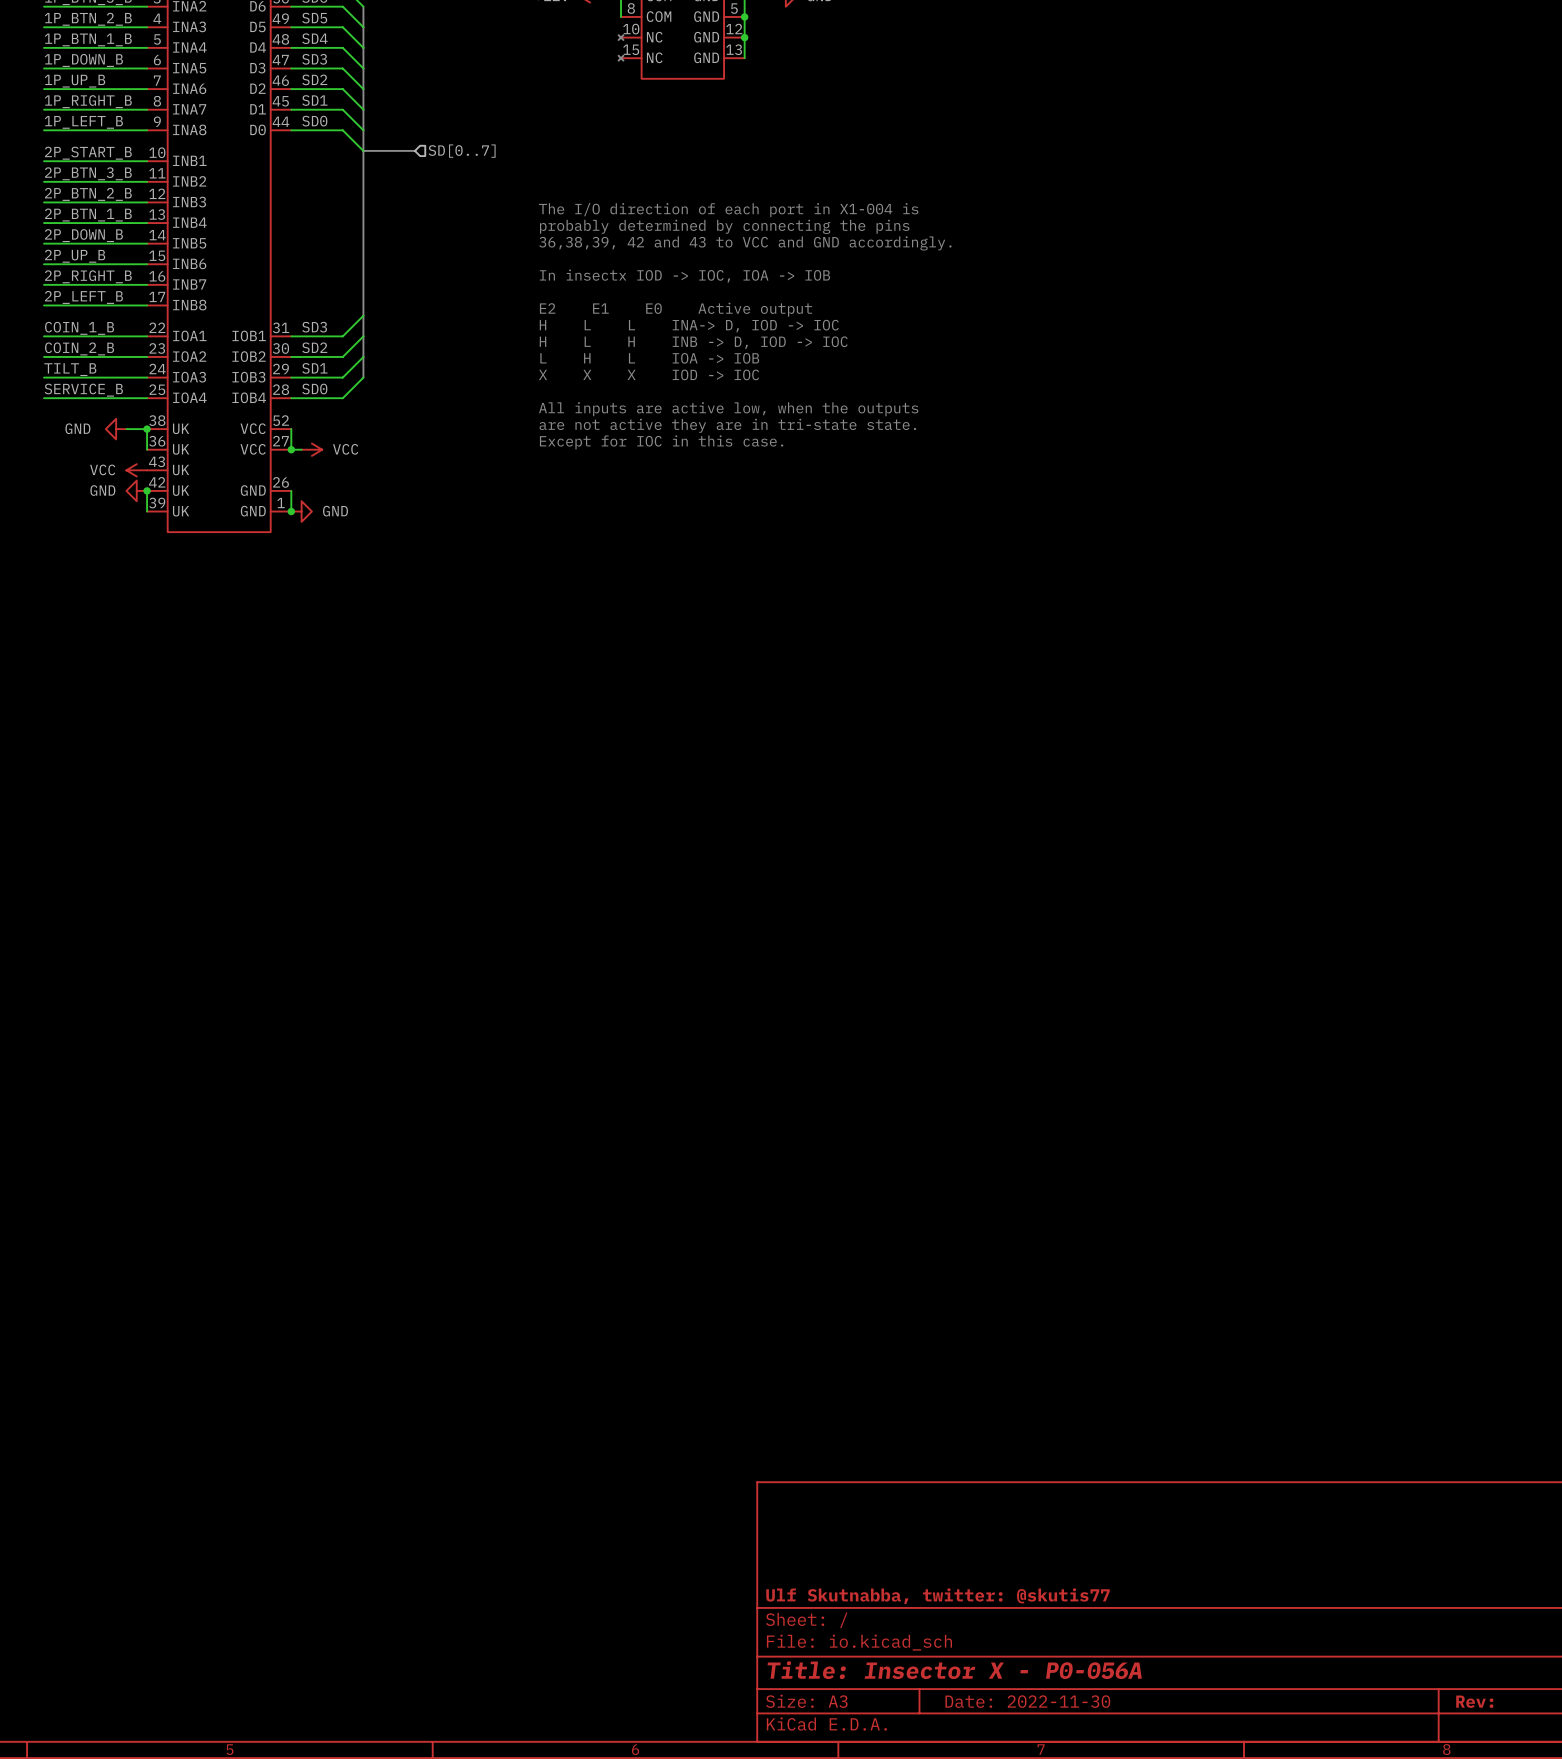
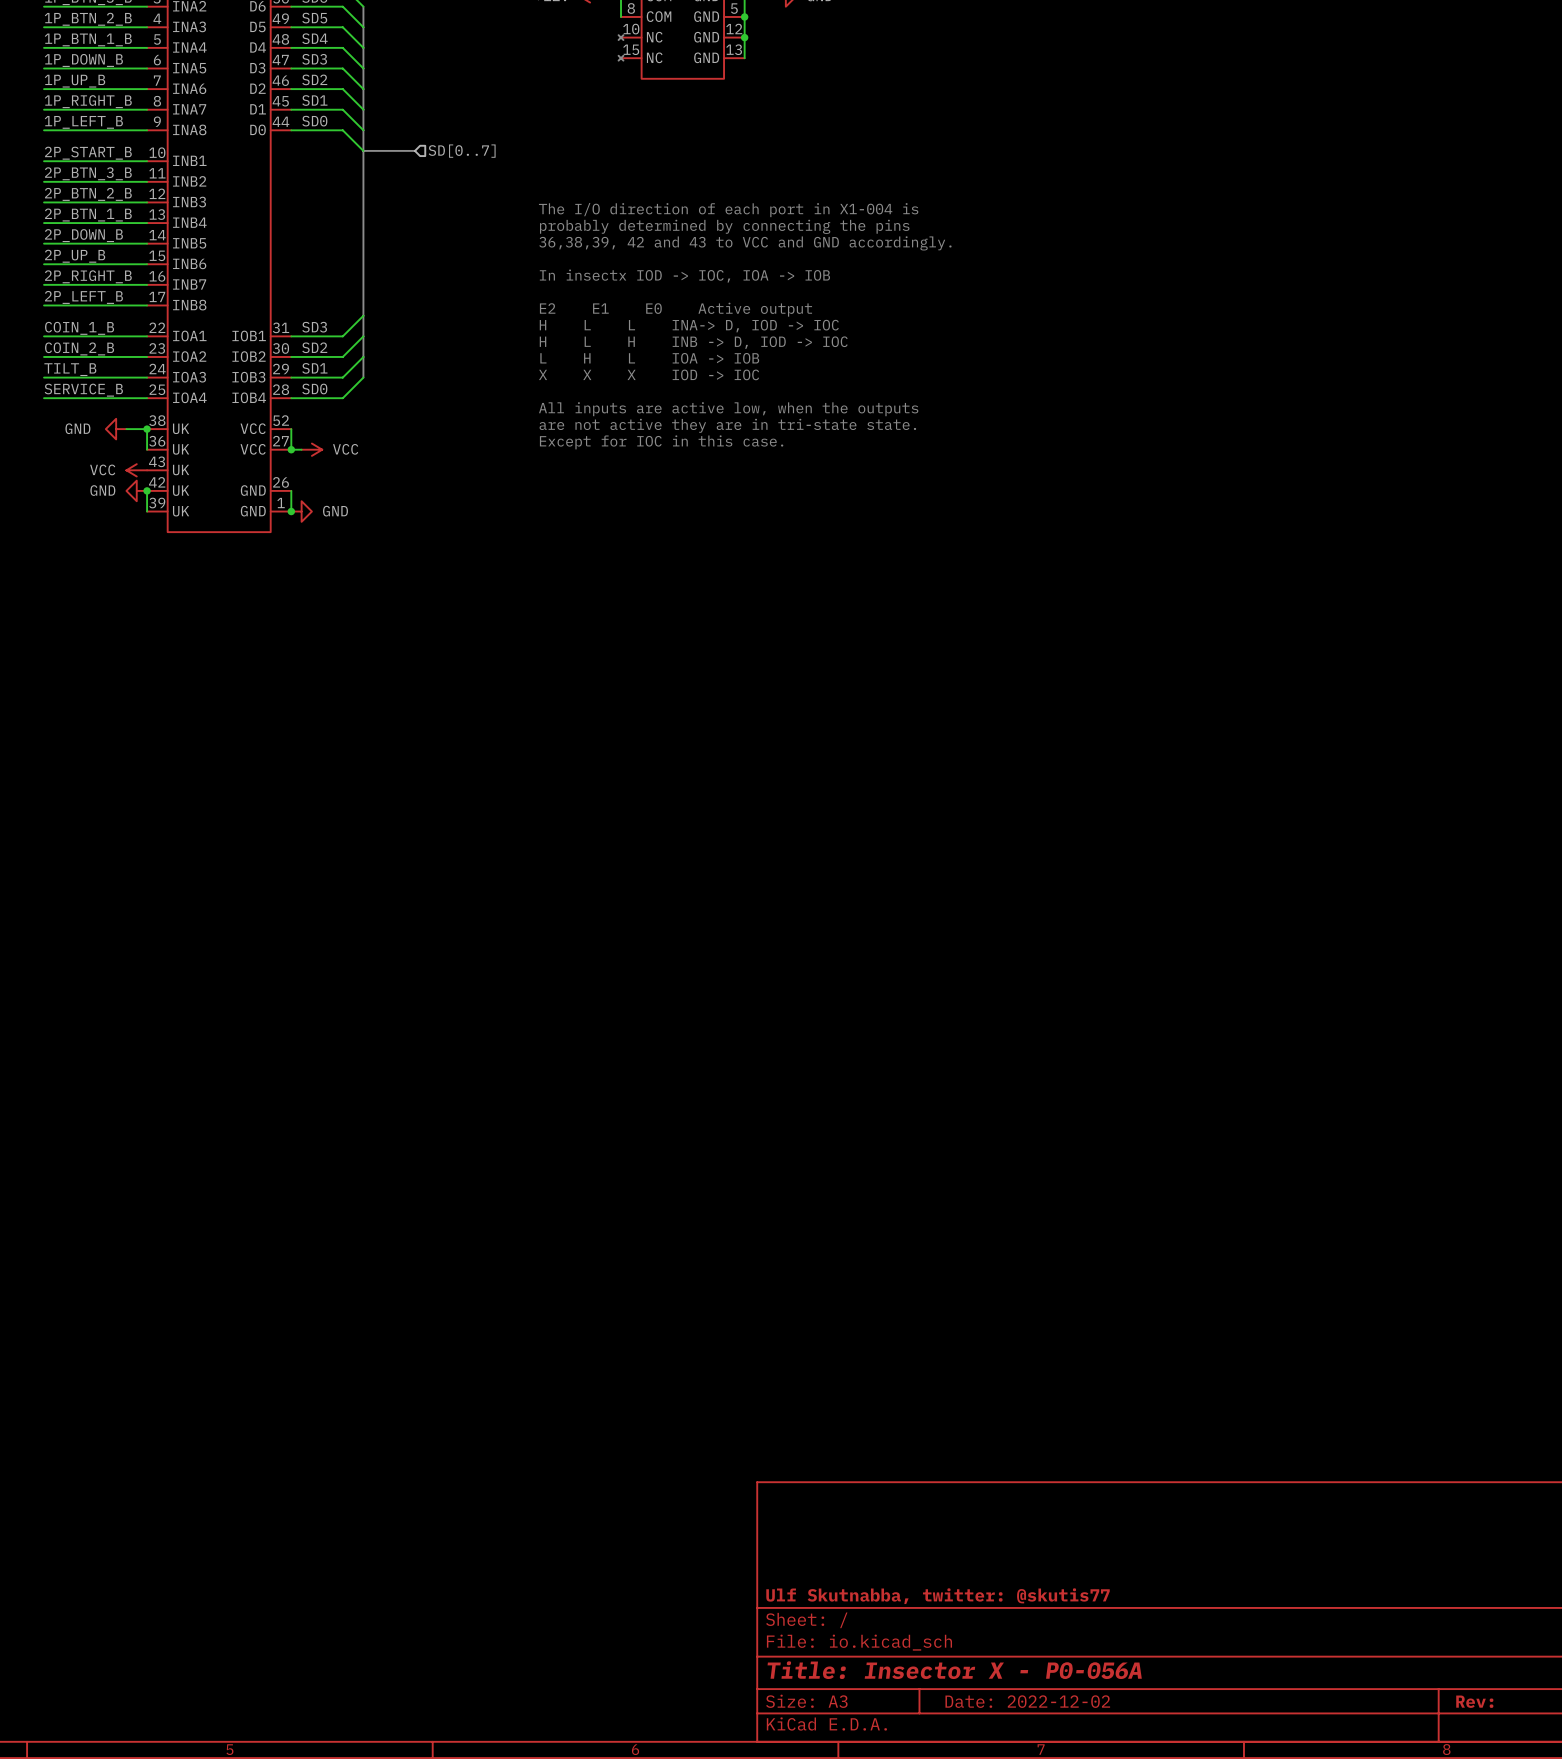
title block: Date: 2022-11-30 (1027, 1701) -> Date: 2022-12-02 (1027, 1701)

